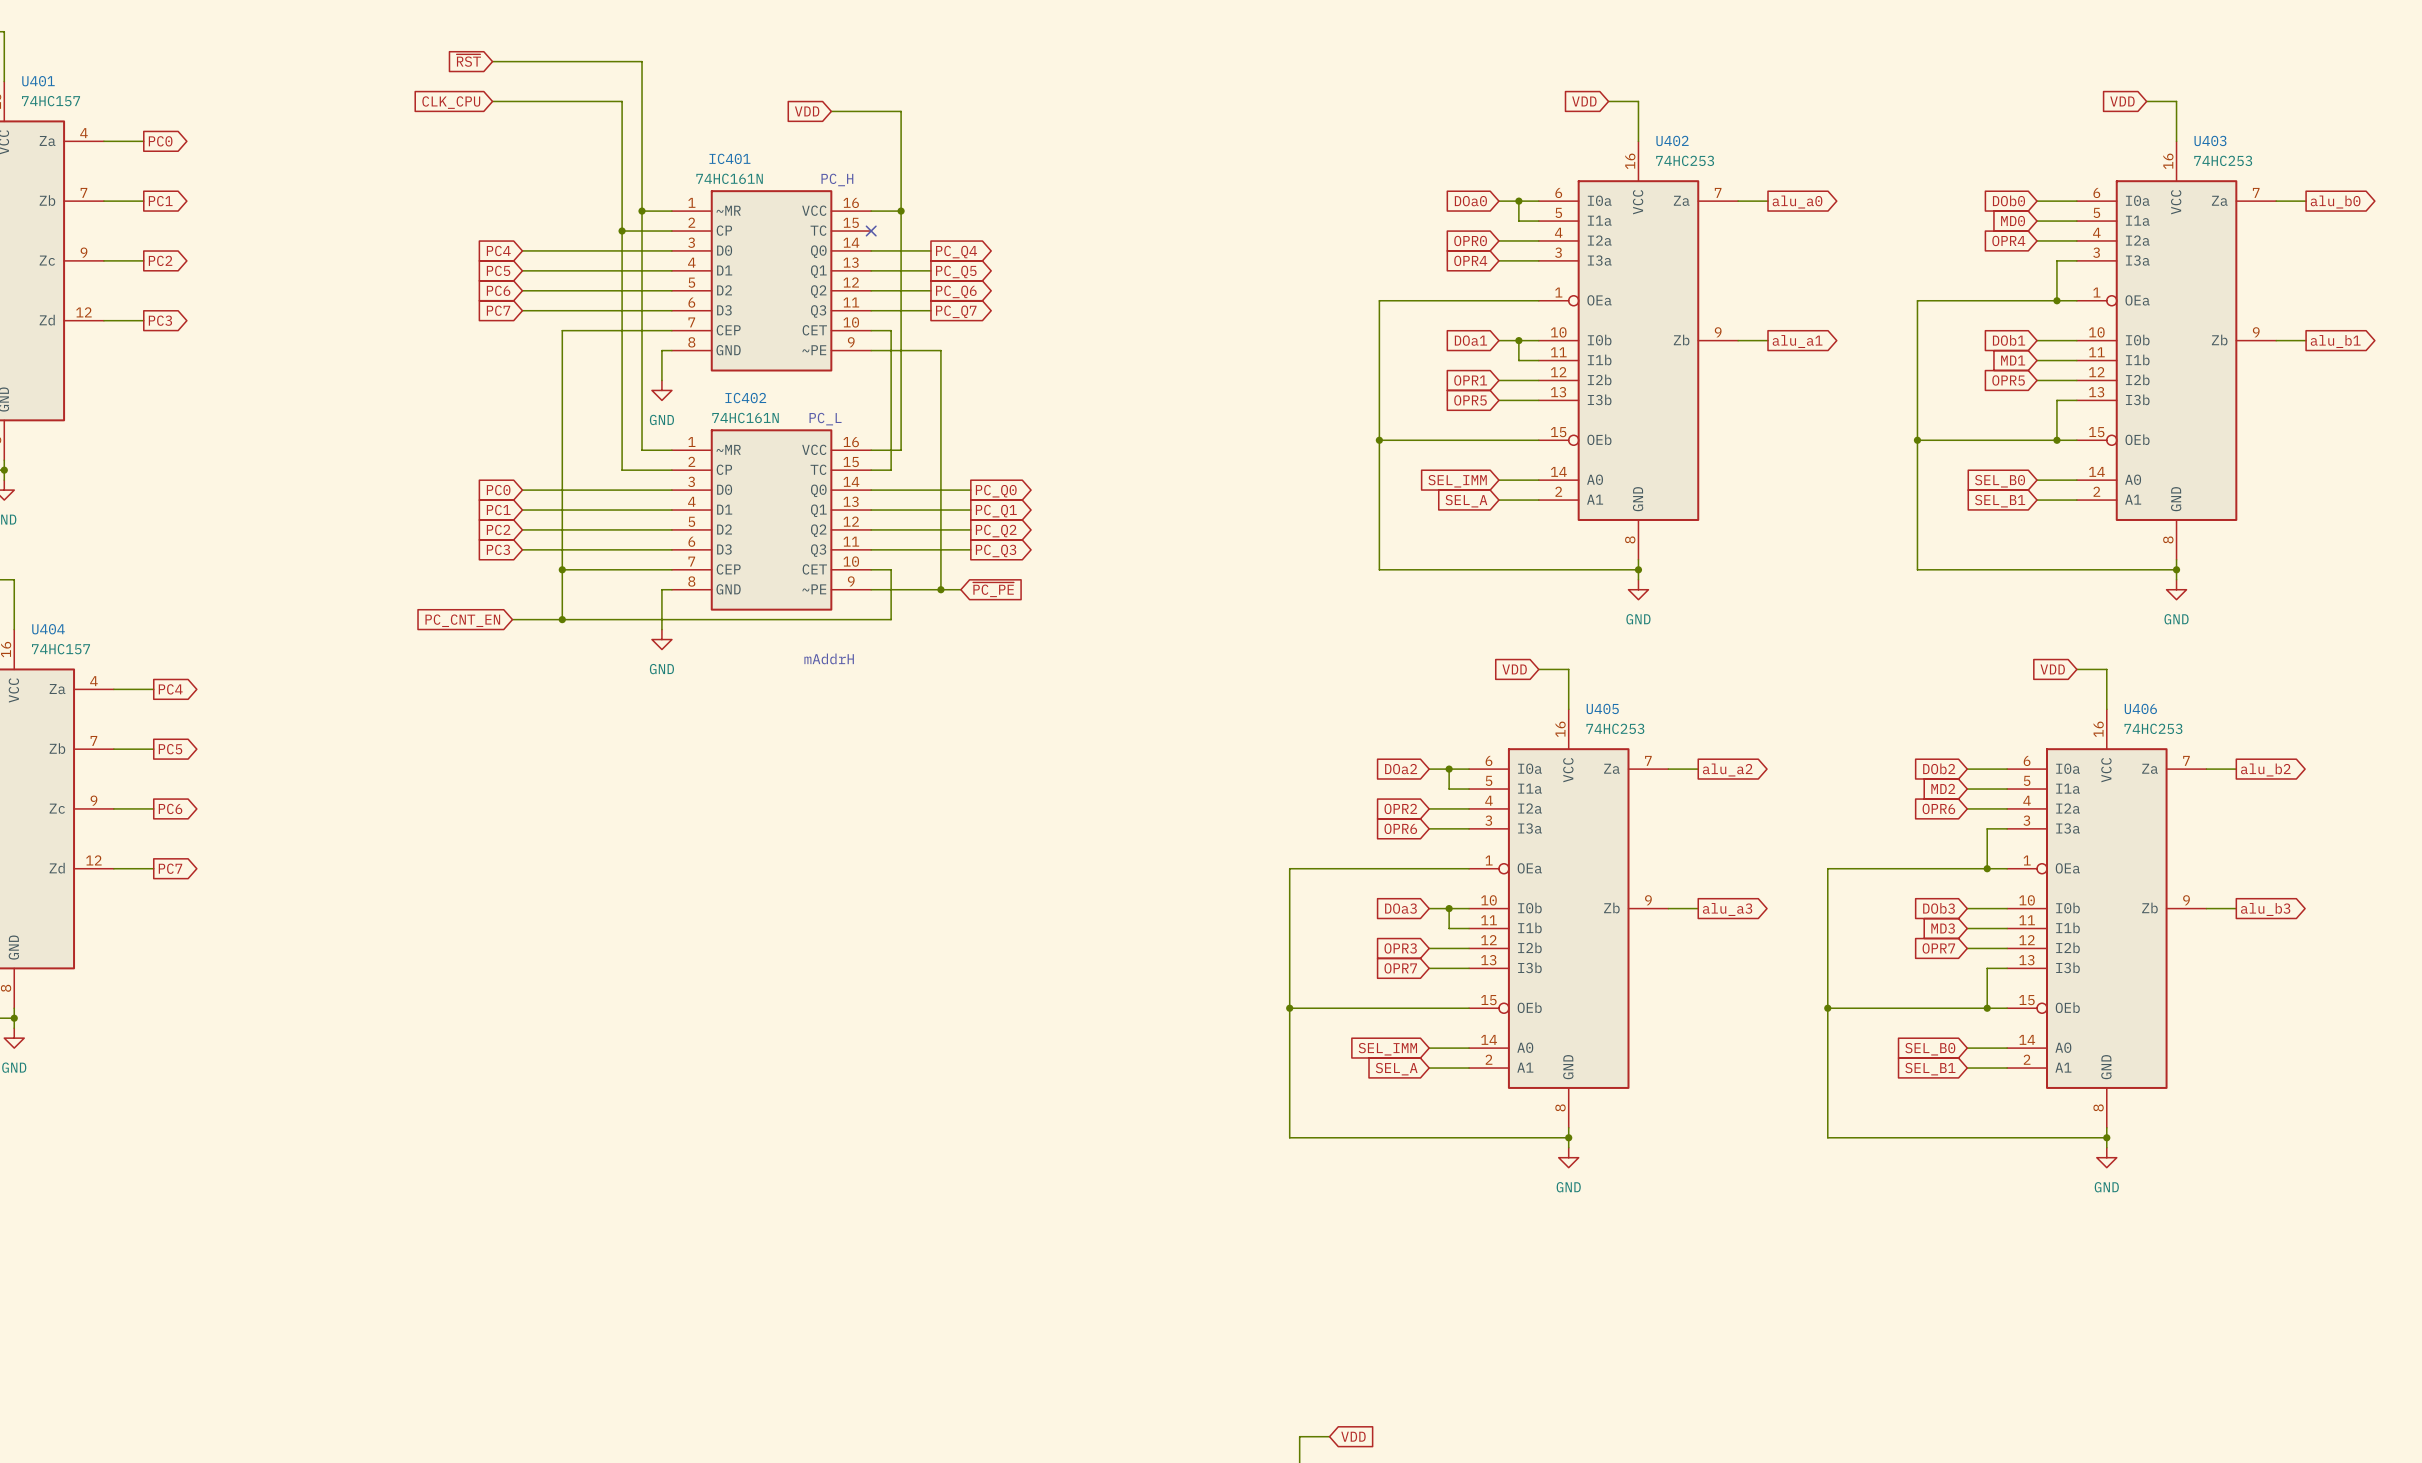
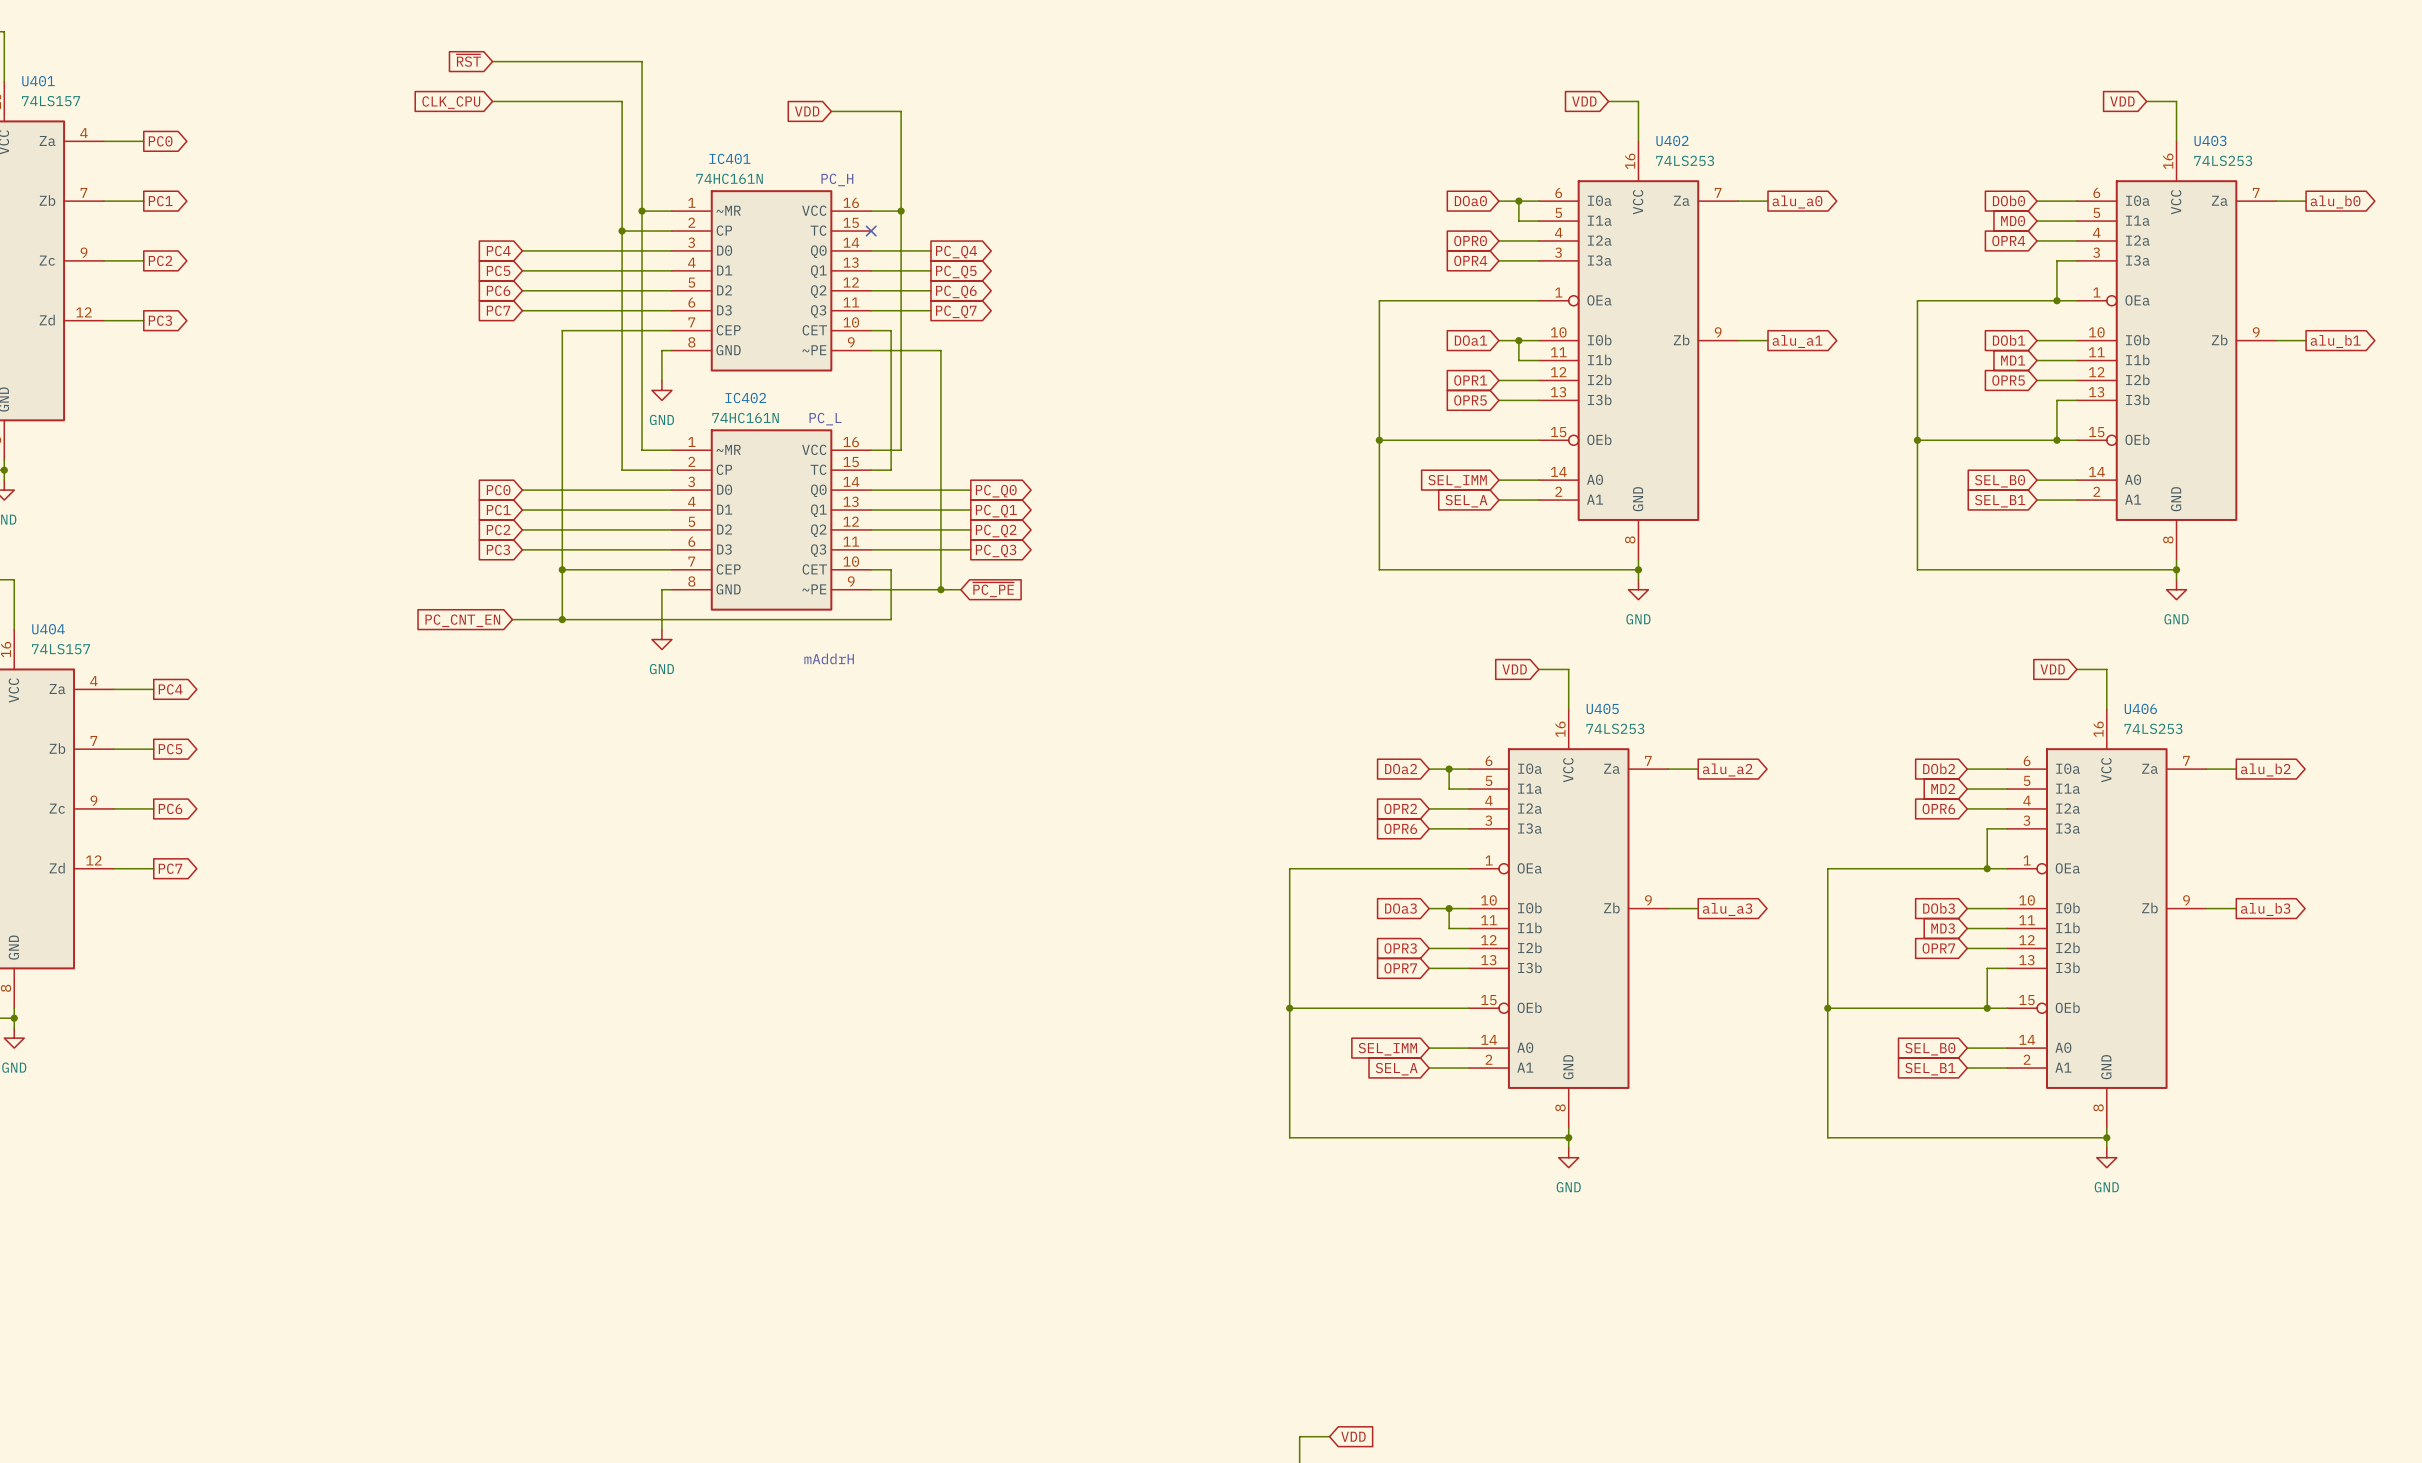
U401 value: 74HC157 (51, 101) -> 74LS157 (51, 101)
U402 value: 74HC253 (1685, 160) -> 74LS253 (1685, 160)
U403 value: 74HC253 (2223, 160) -> 74LS253 (2223, 160)
U404 value: 74HC157 (61, 649) -> 74LS157 (61, 649)
U405 value: 74HC253 (1615, 728) -> 74LS253 (1615, 728)
U406 value: 74HC253 (2153, 728) -> 74LS253 (2153, 728)

